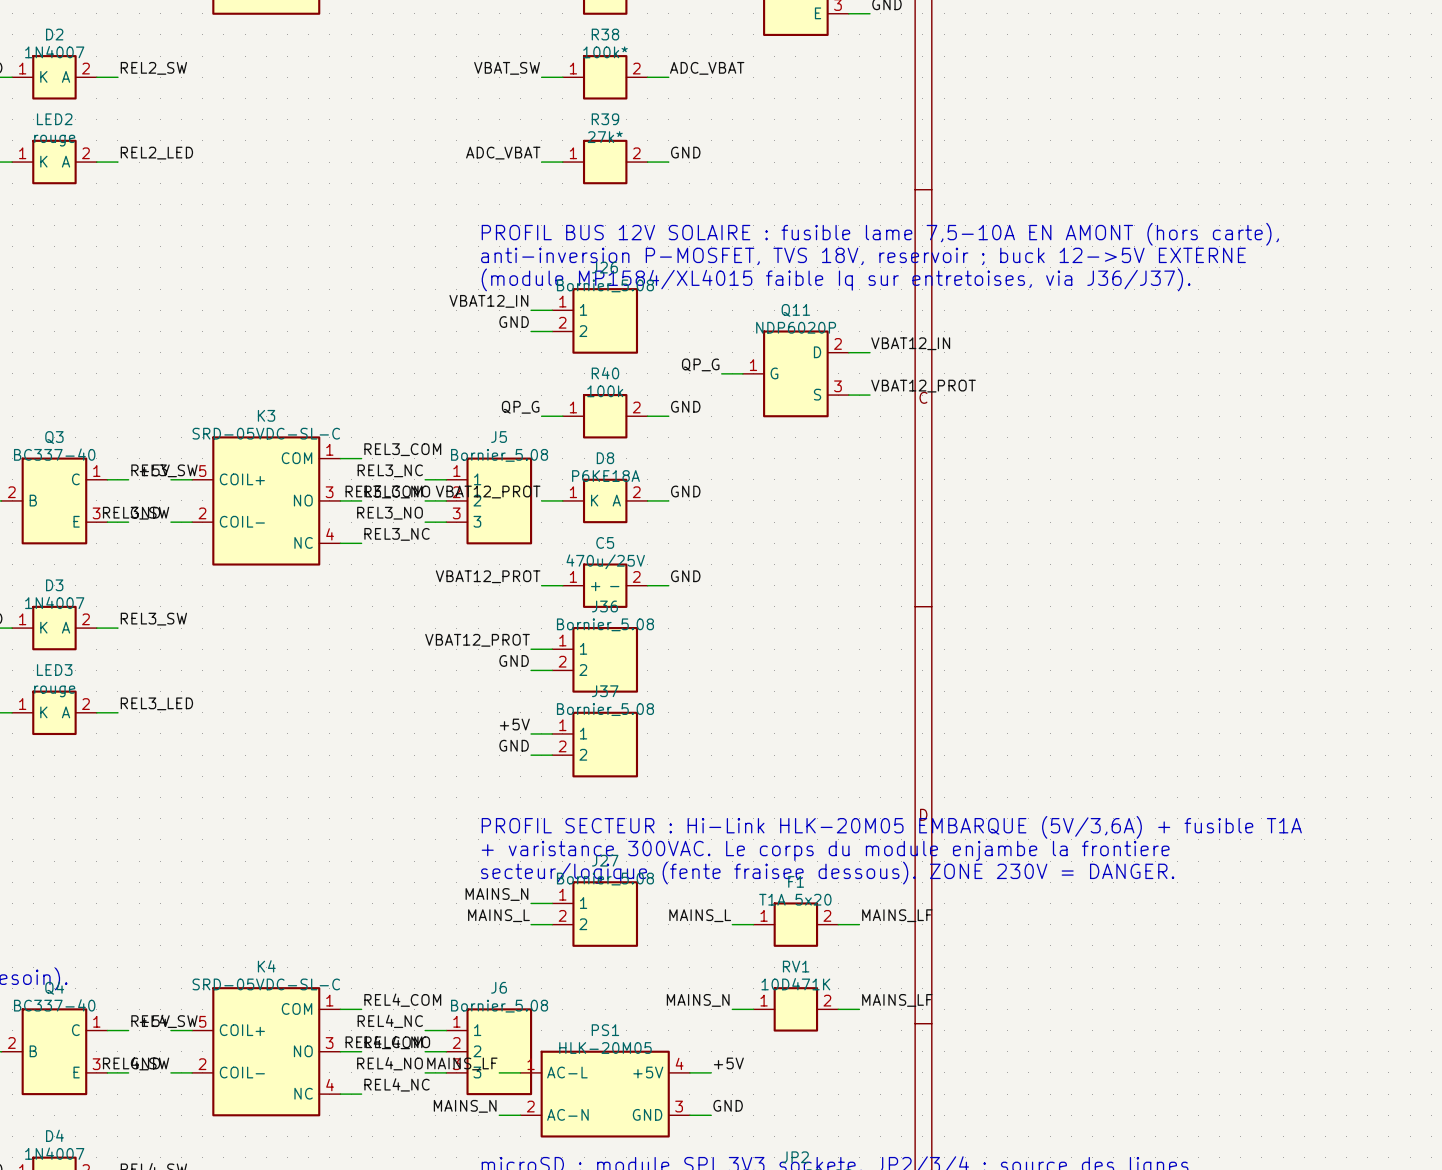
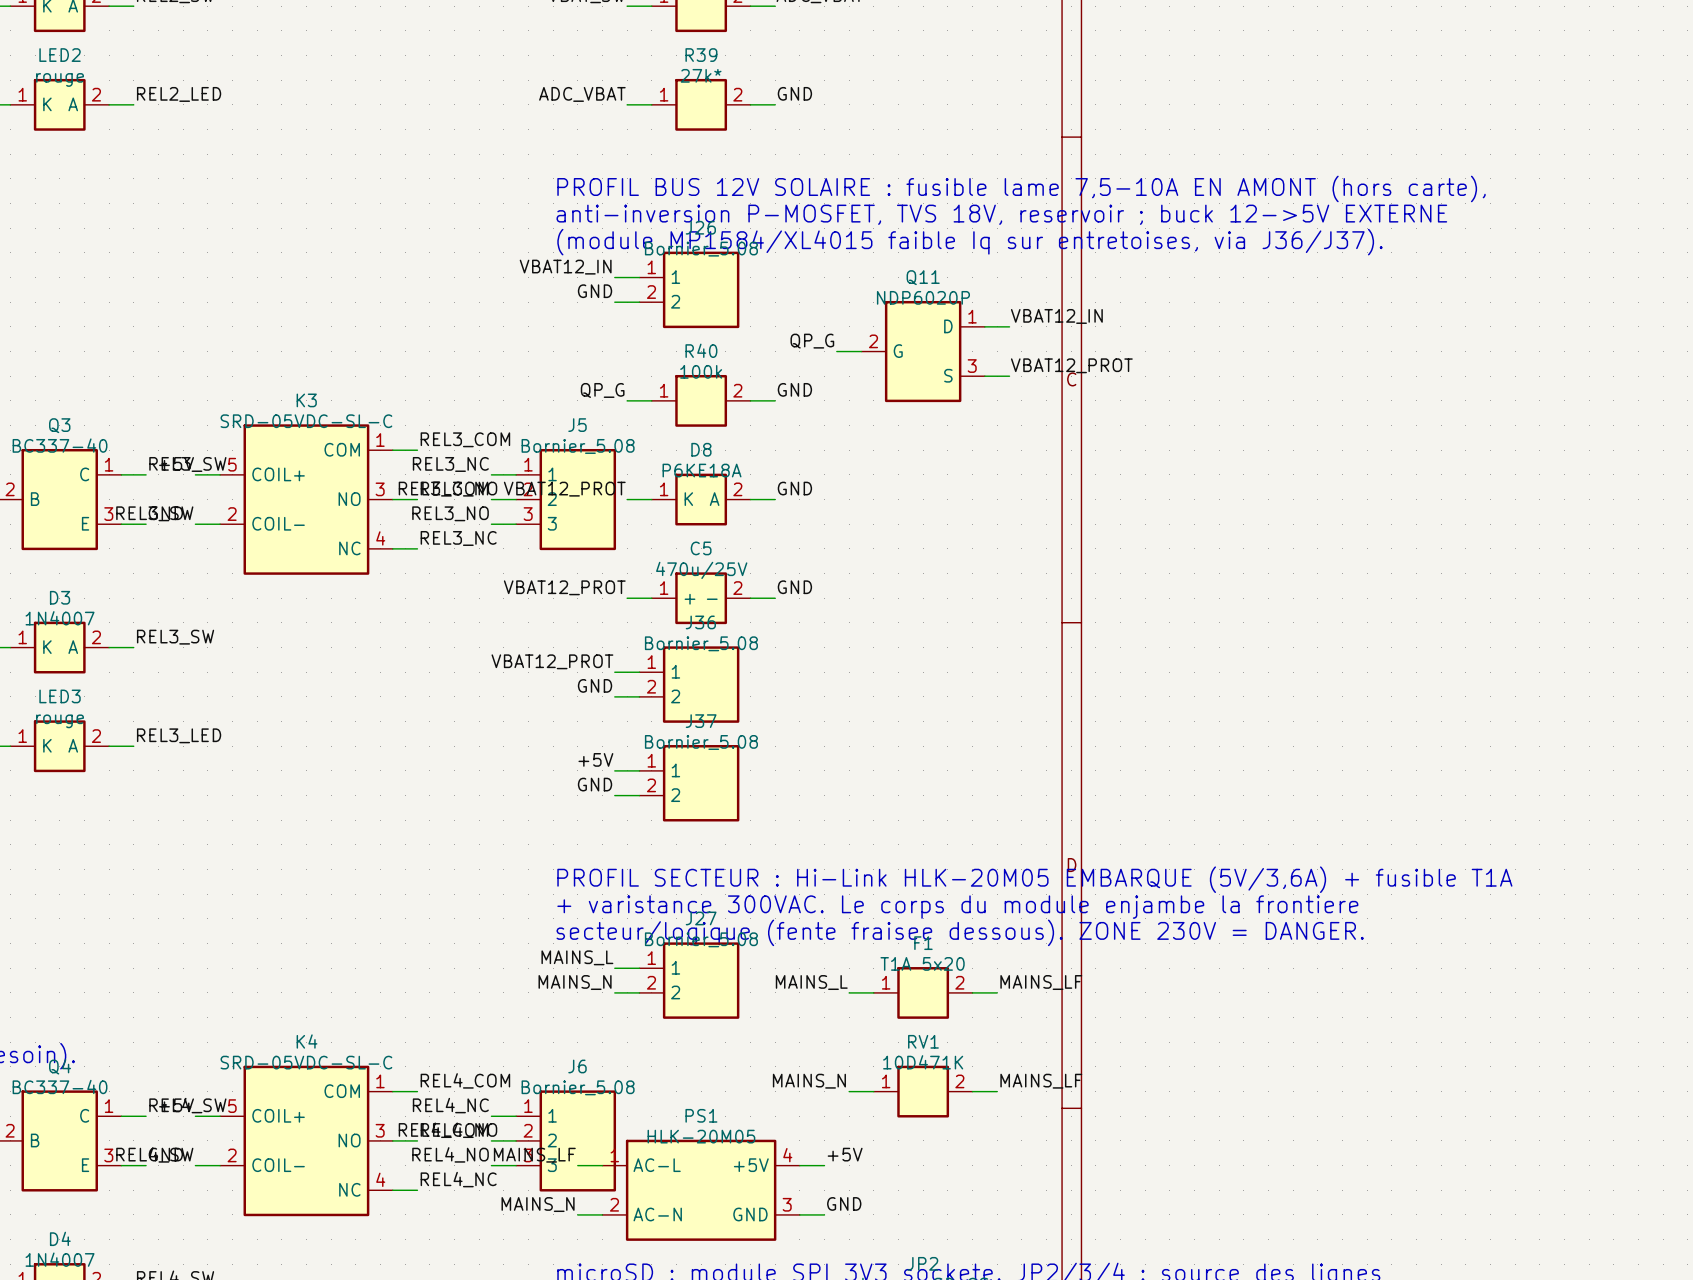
Q11 pin number: 2 (837, 343) -> 1 (972, 316)
Q11 pin number: 1 (753, 365) -> 2 (873, 341)
label: MAINS_N (496, 894) -> MAINS_L (577, 957)
label: MAINS_L (498, 915) -> MAINS_N (575, 982)

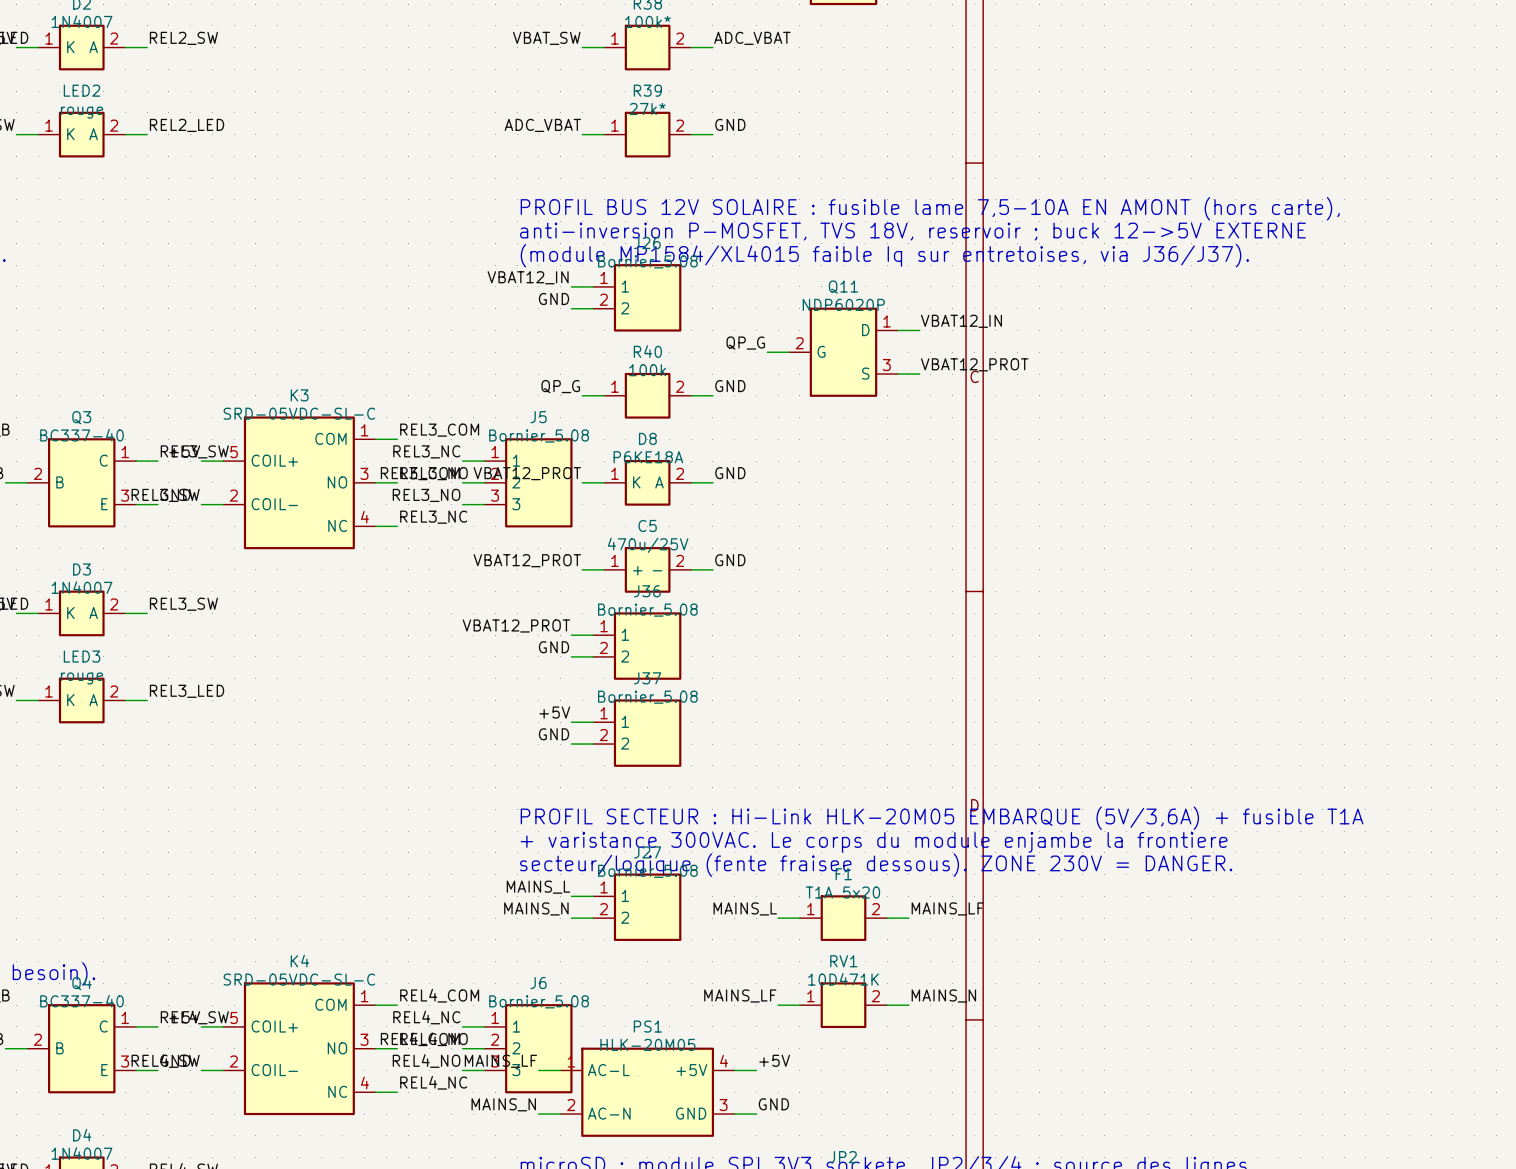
label: MAINS_N (809, 1081) -> MAINS_LF (740, 995)
label: MAINS_LF (1041, 1081) -> MAINS_N (943, 995)

